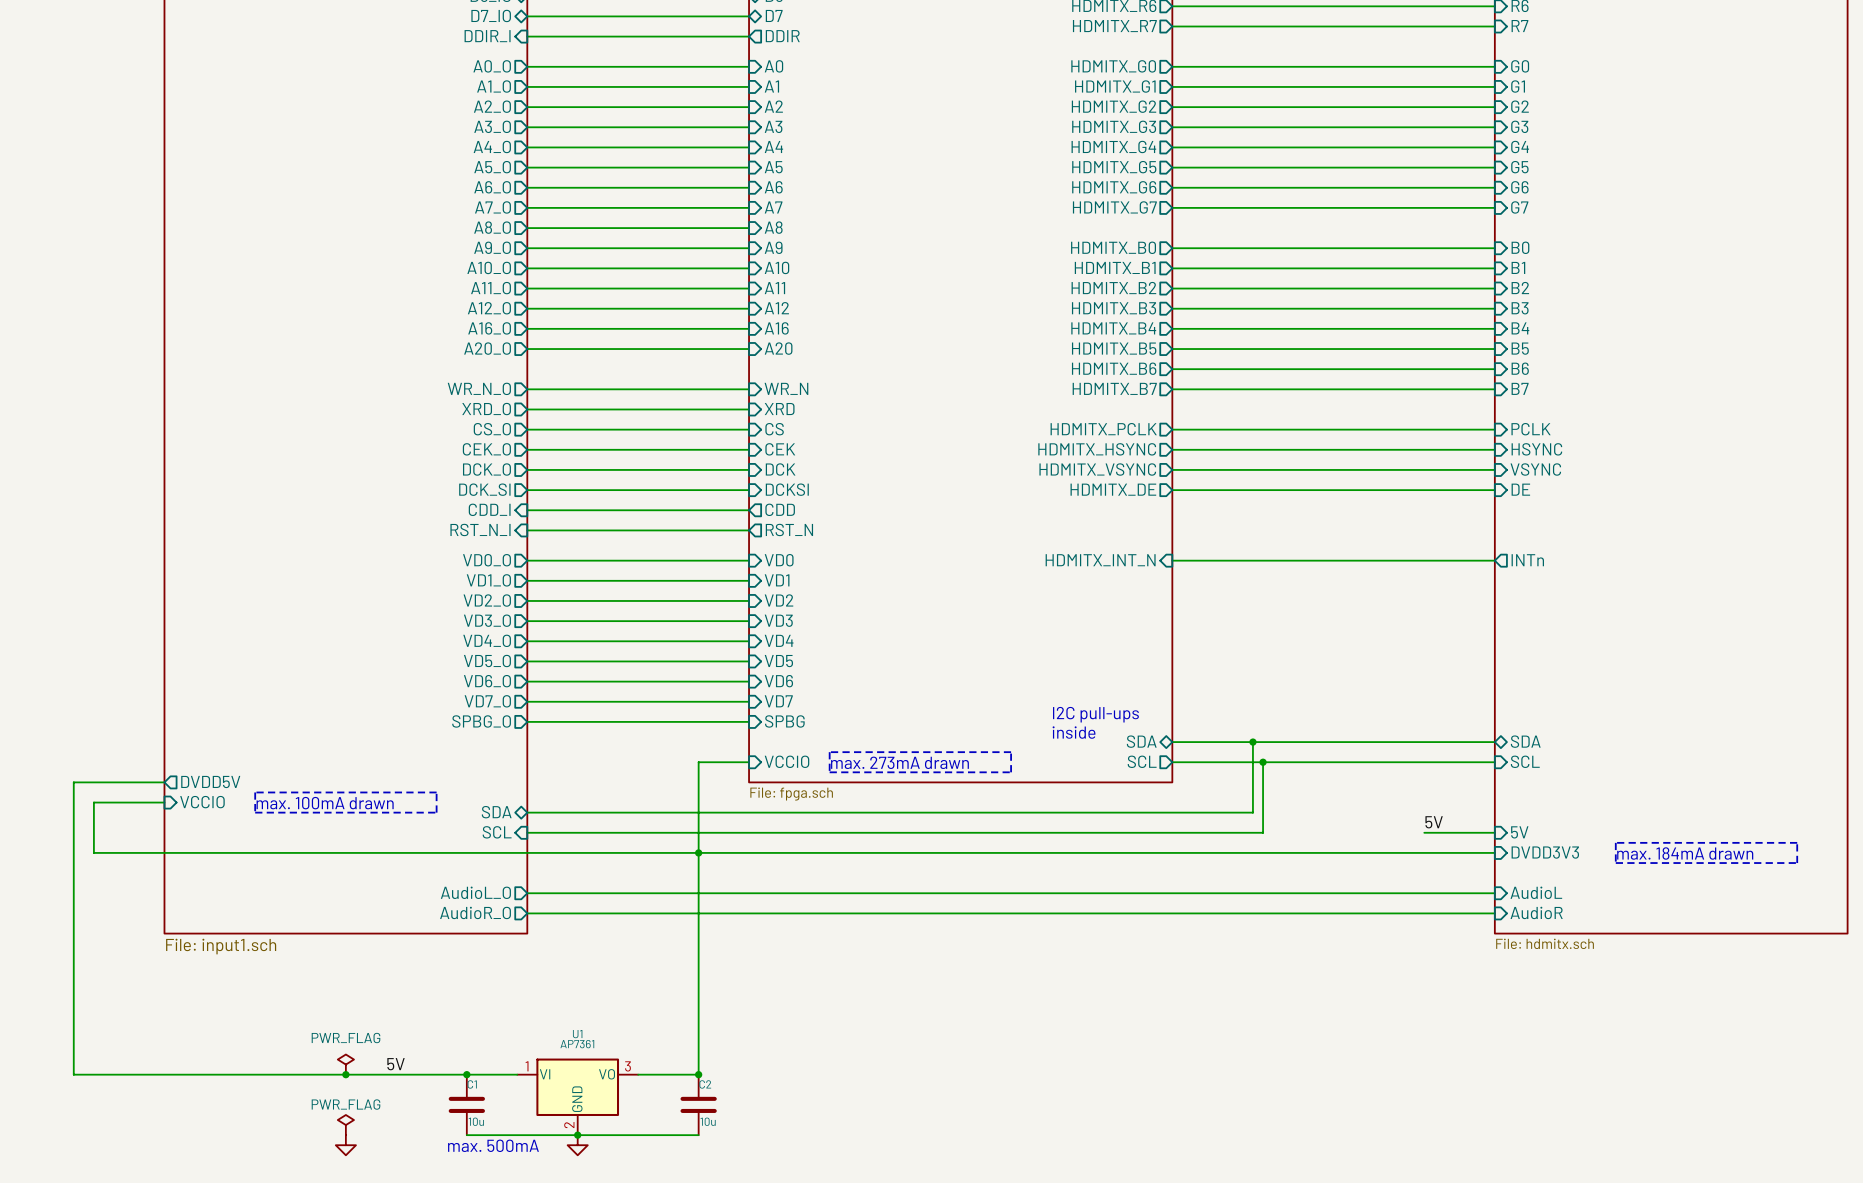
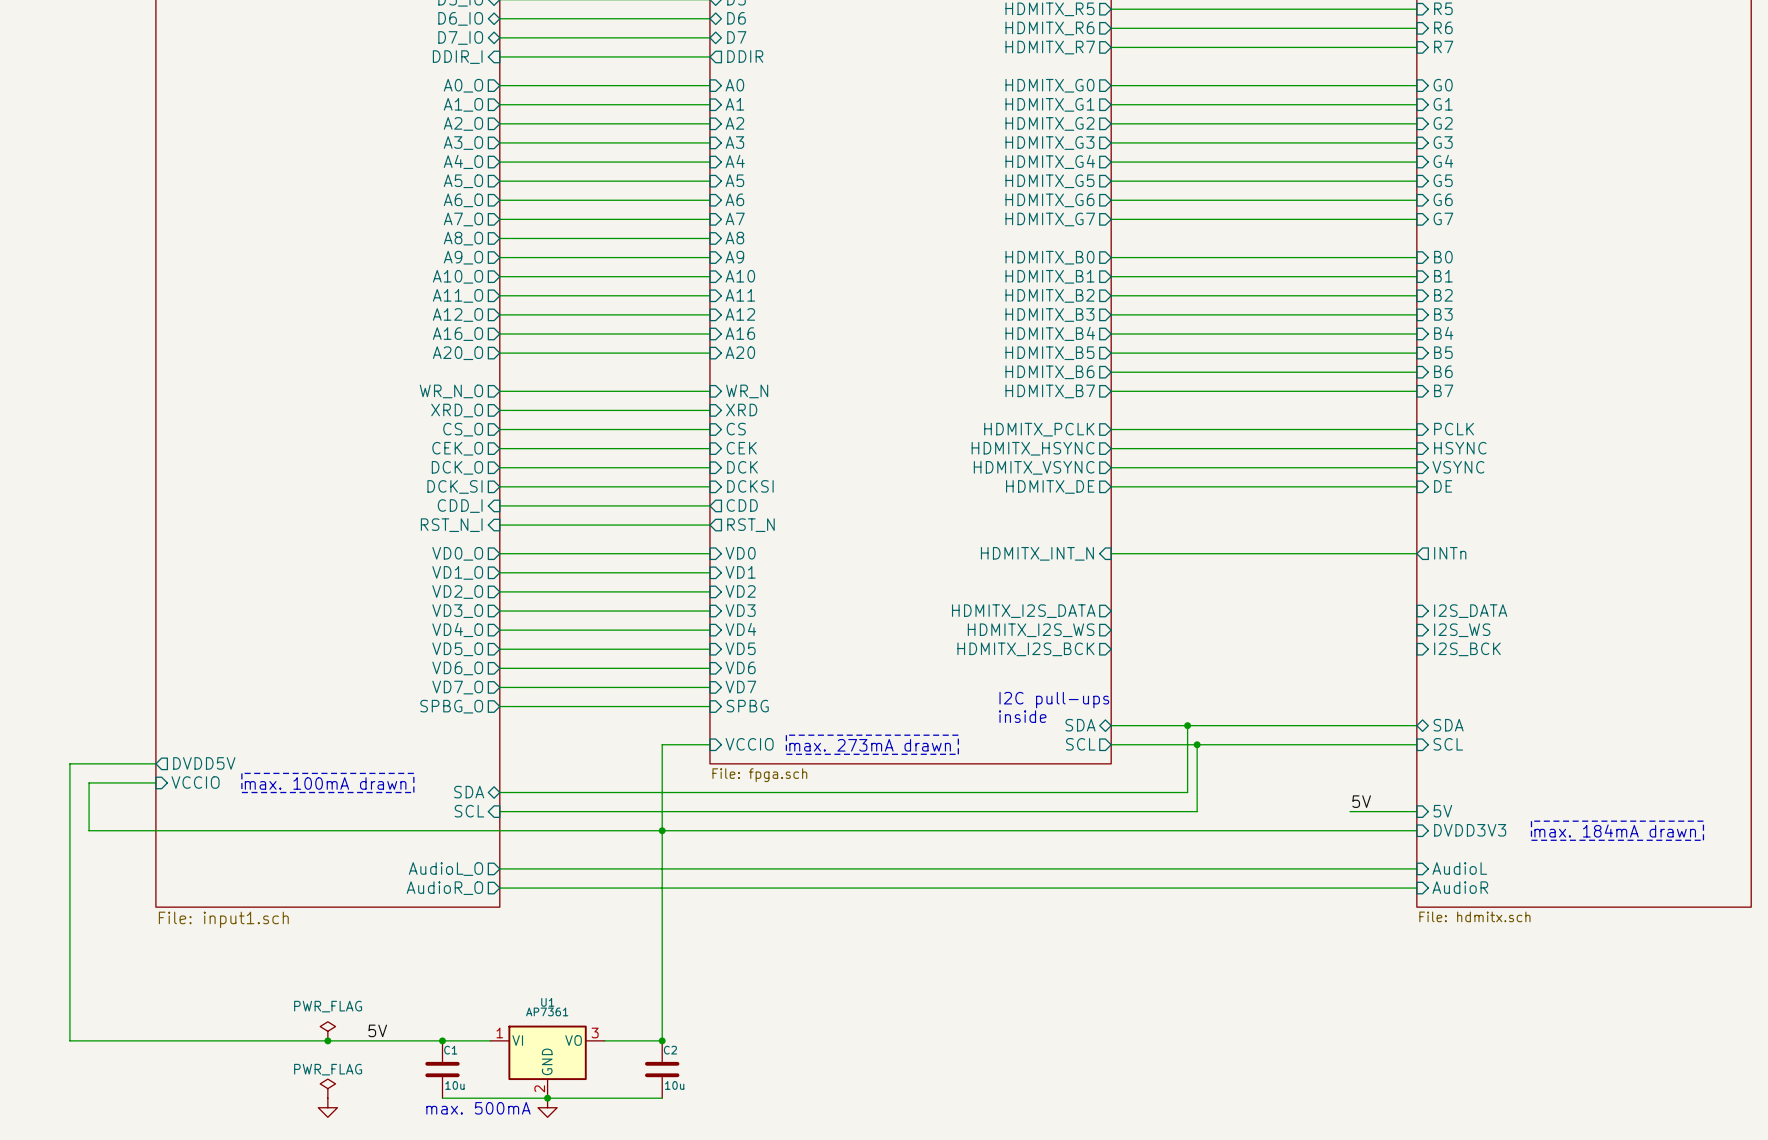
sheet pin: none -> HDMITX_I2S_DATA (1023, 611)
sheet pin: none -> I2S_DATA (1470, 611)
sheet pin: none -> HDMITX_I2S_WS (1031, 630)
sheet pin: none -> I2S_WS (1462, 630)
sheet pin: none -> HDMITX_I2S_BCK (1025, 649)
sheet pin: none -> I2S_BCK (1467, 649)

